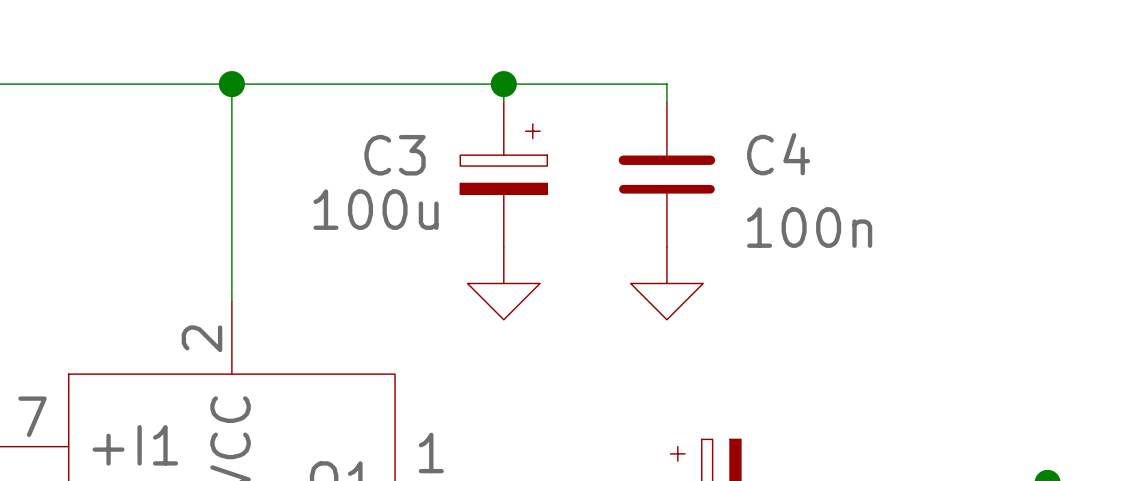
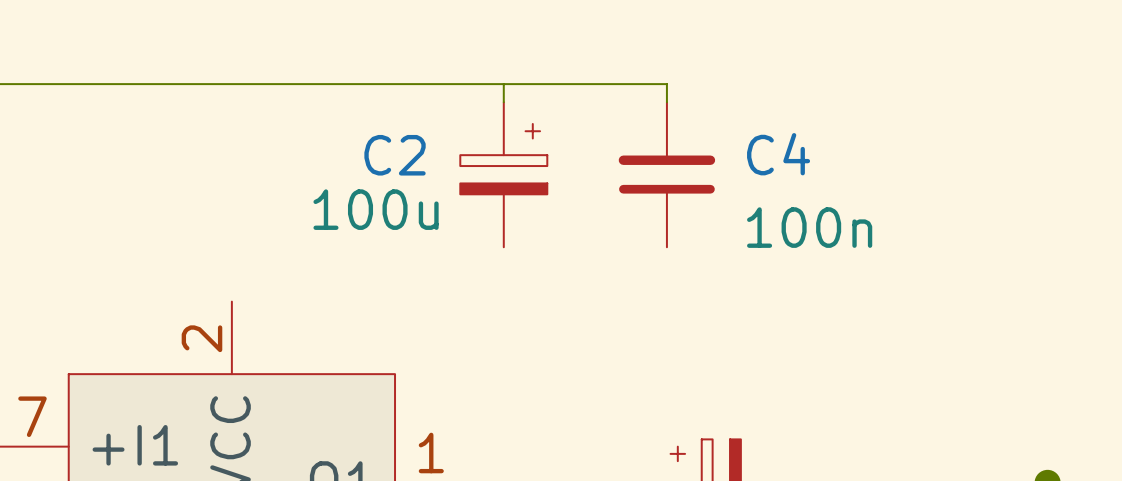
wire: (231, 84) (231, 301) -> none
junction: (231, 84) -> none
junction: (503, 84) -> none
C3 name: C3 (395, 155) -> C2 (395, 155)
power symbol: (503, 283) -> none
power symbol: (666, 283) -> none

